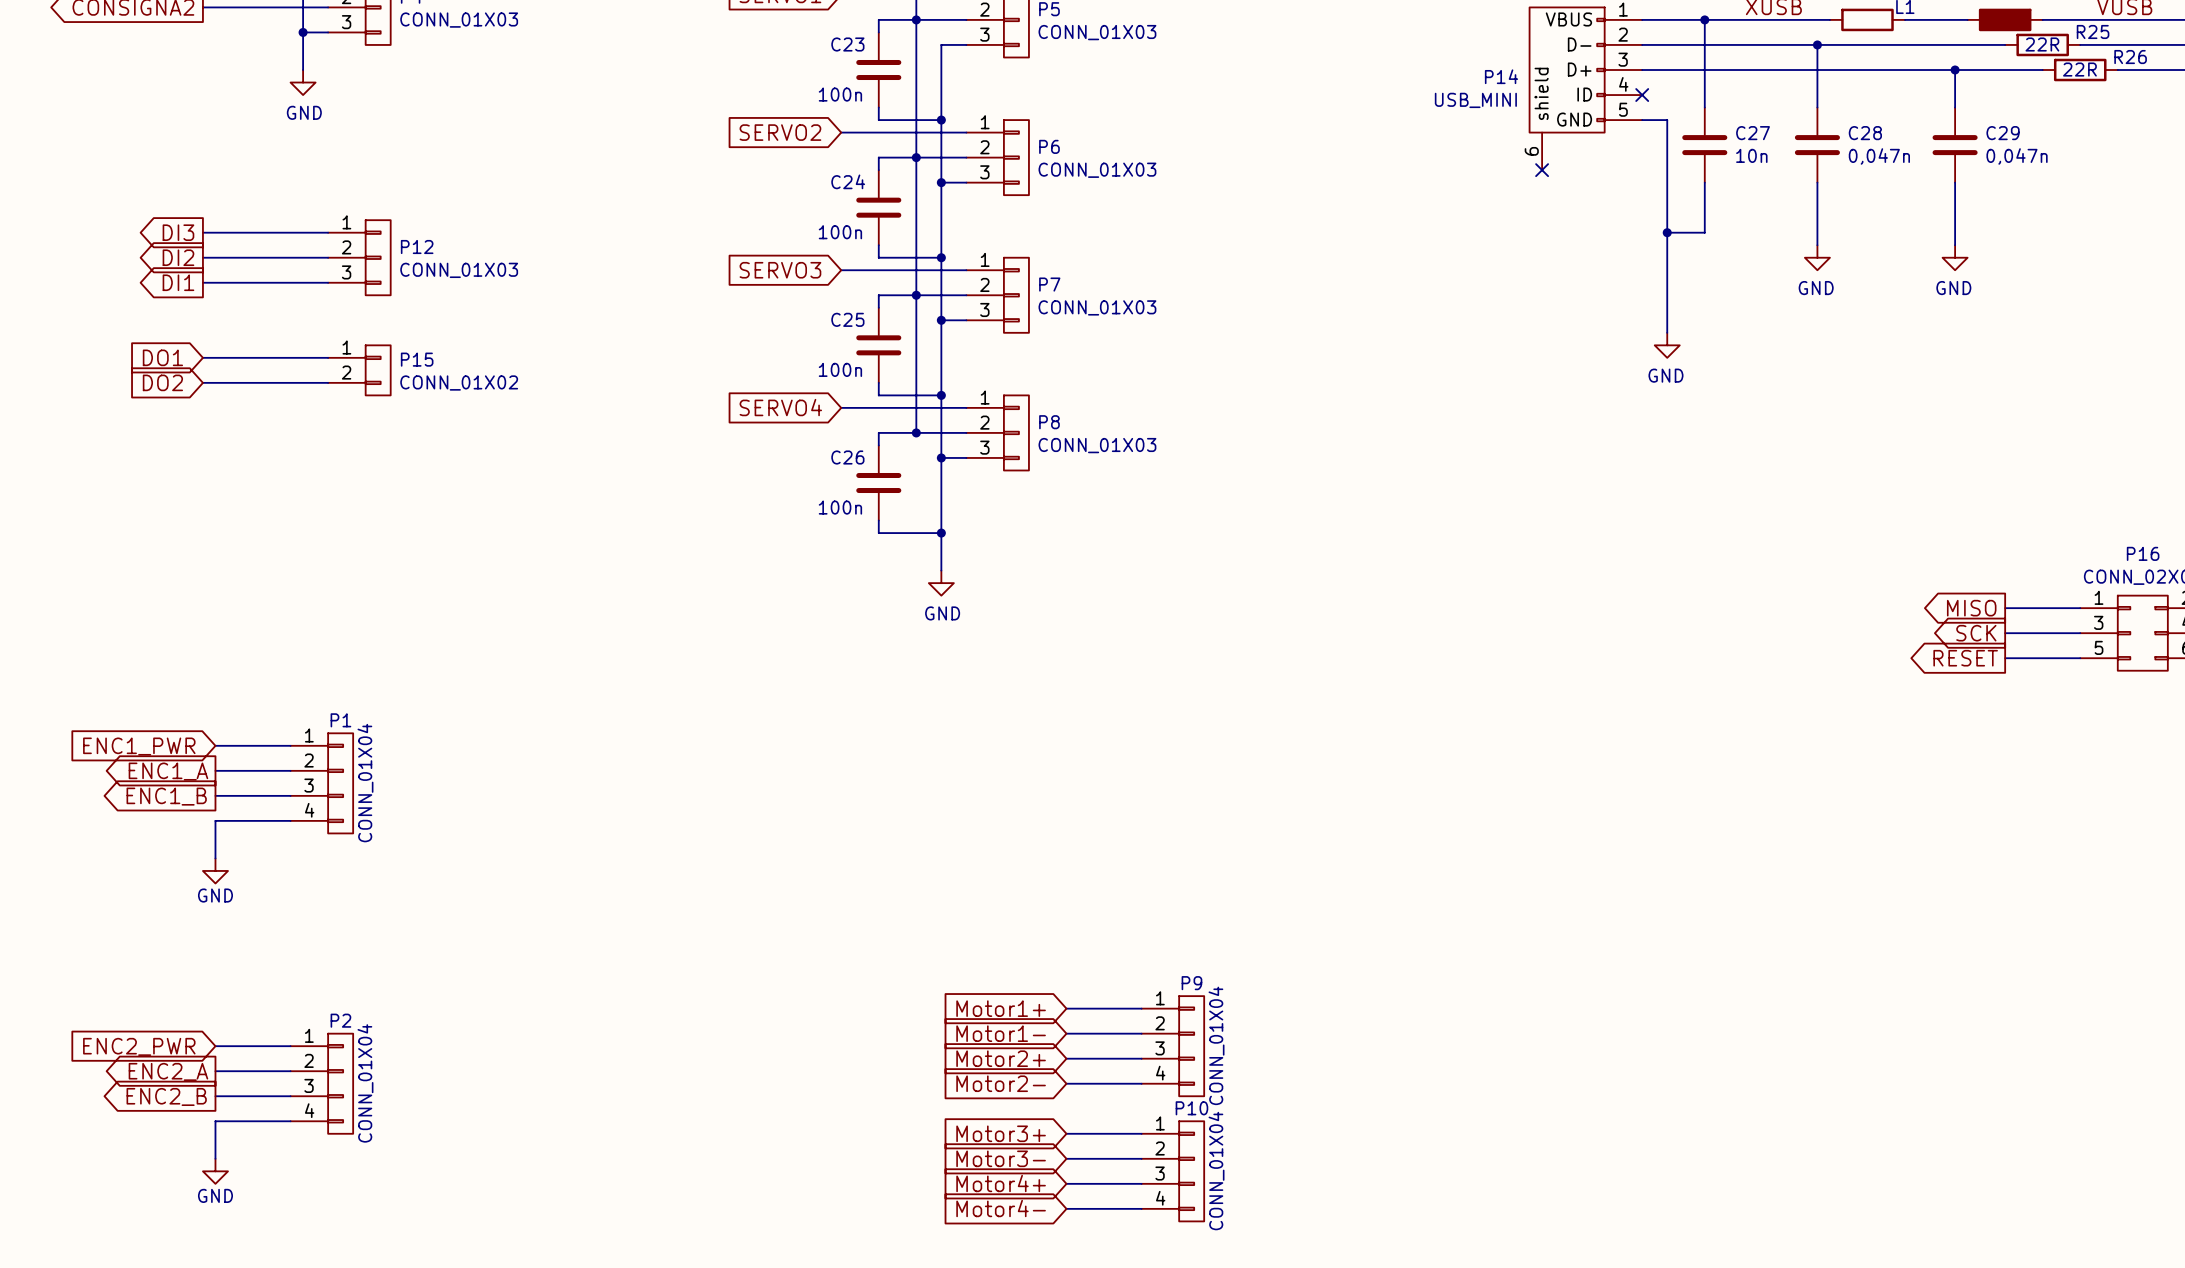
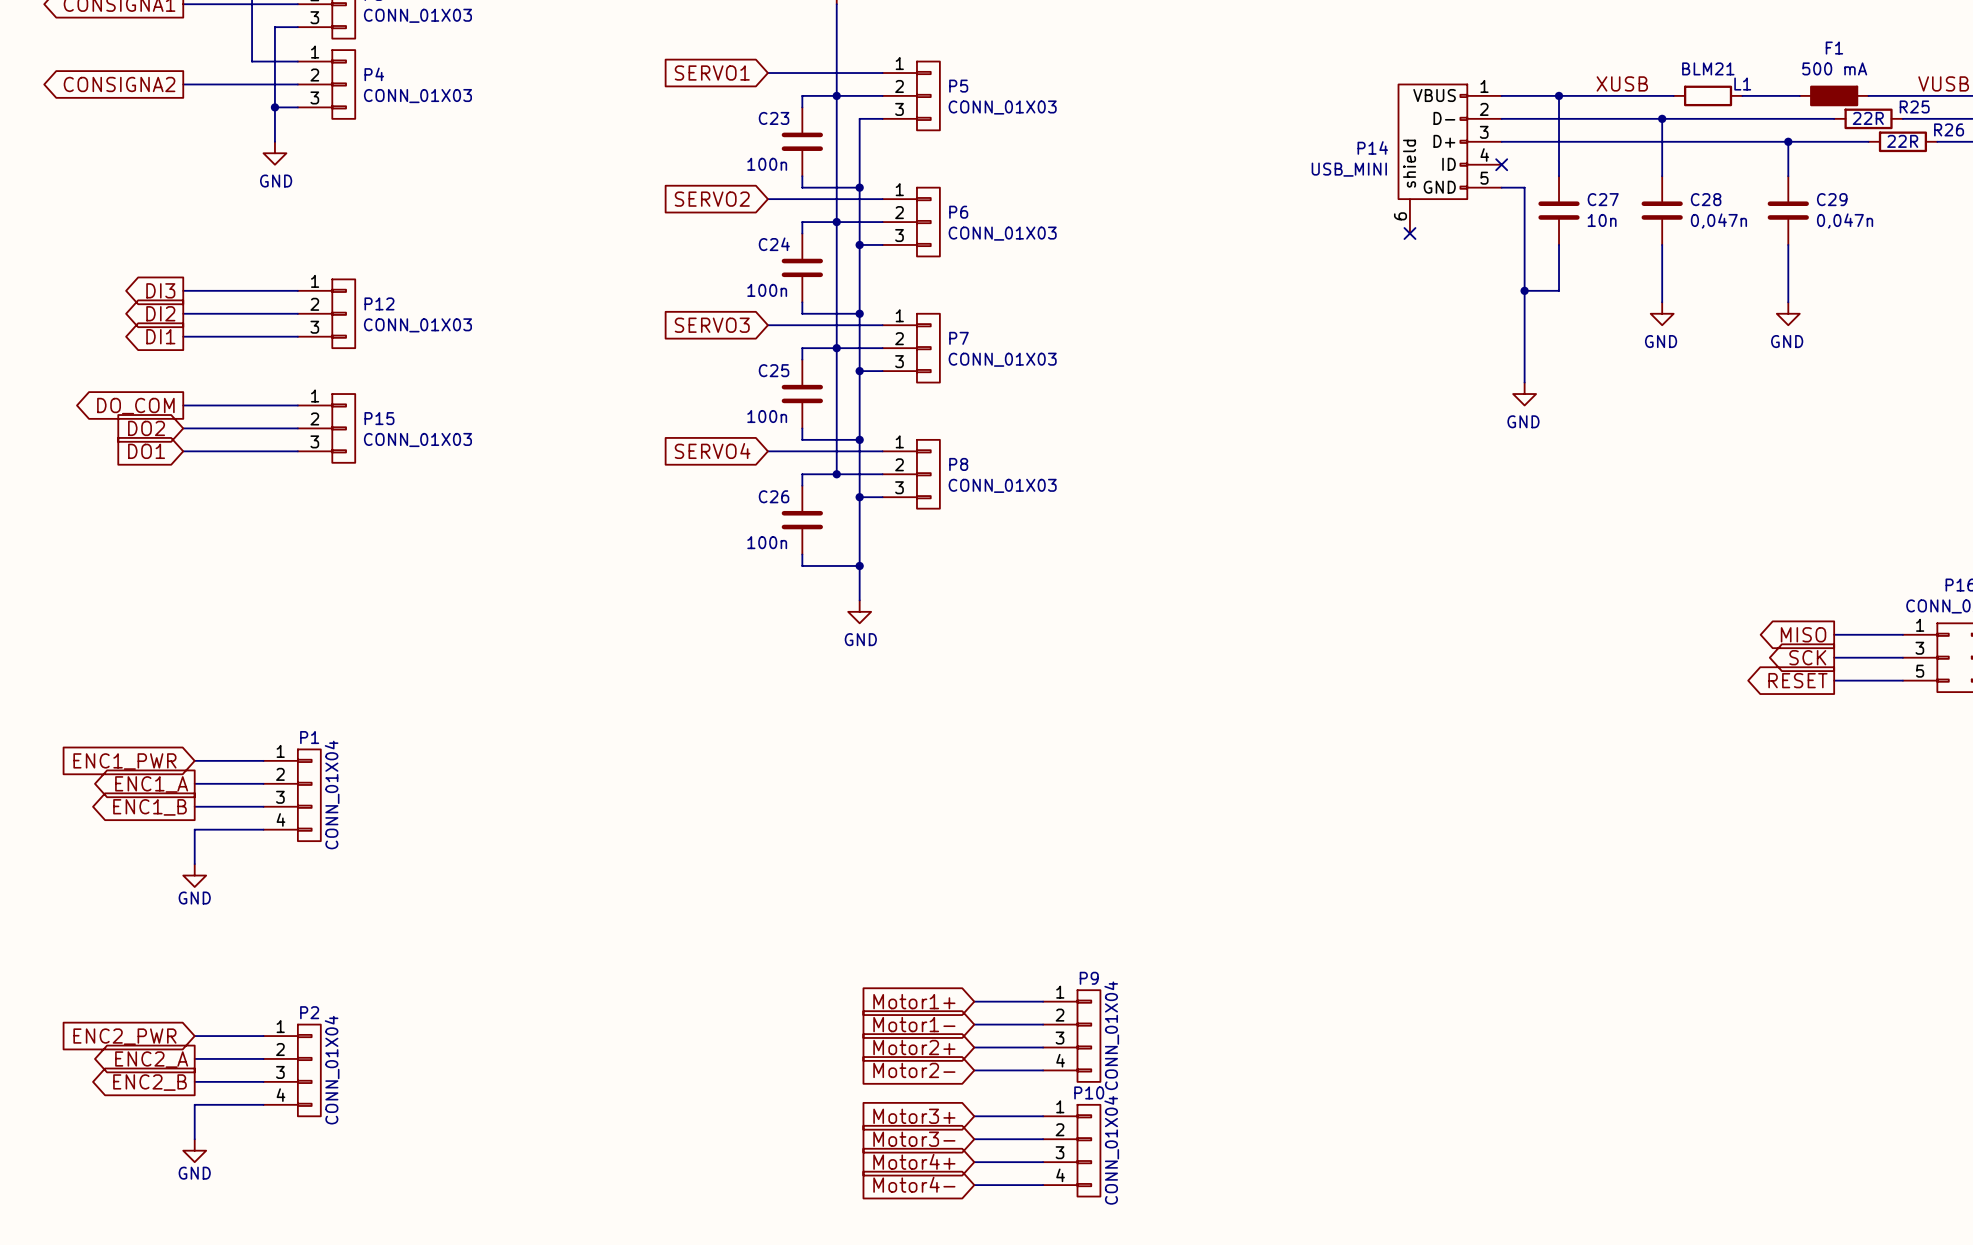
P15 symbol: [328, 345, 391, 396] -> [297, 394, 356, 463]
global label shape: input (162, 357) -> output (135, 406)
global label: DO1 (162, 357) -> DO_COM (135, 406)
P15 value: CONN_01X02 (459, 383) -> CONN_01X03 (417, 439)
global label: none -> DO1 (146, 451)
wire: none -> (183, 451) (297, 451)

